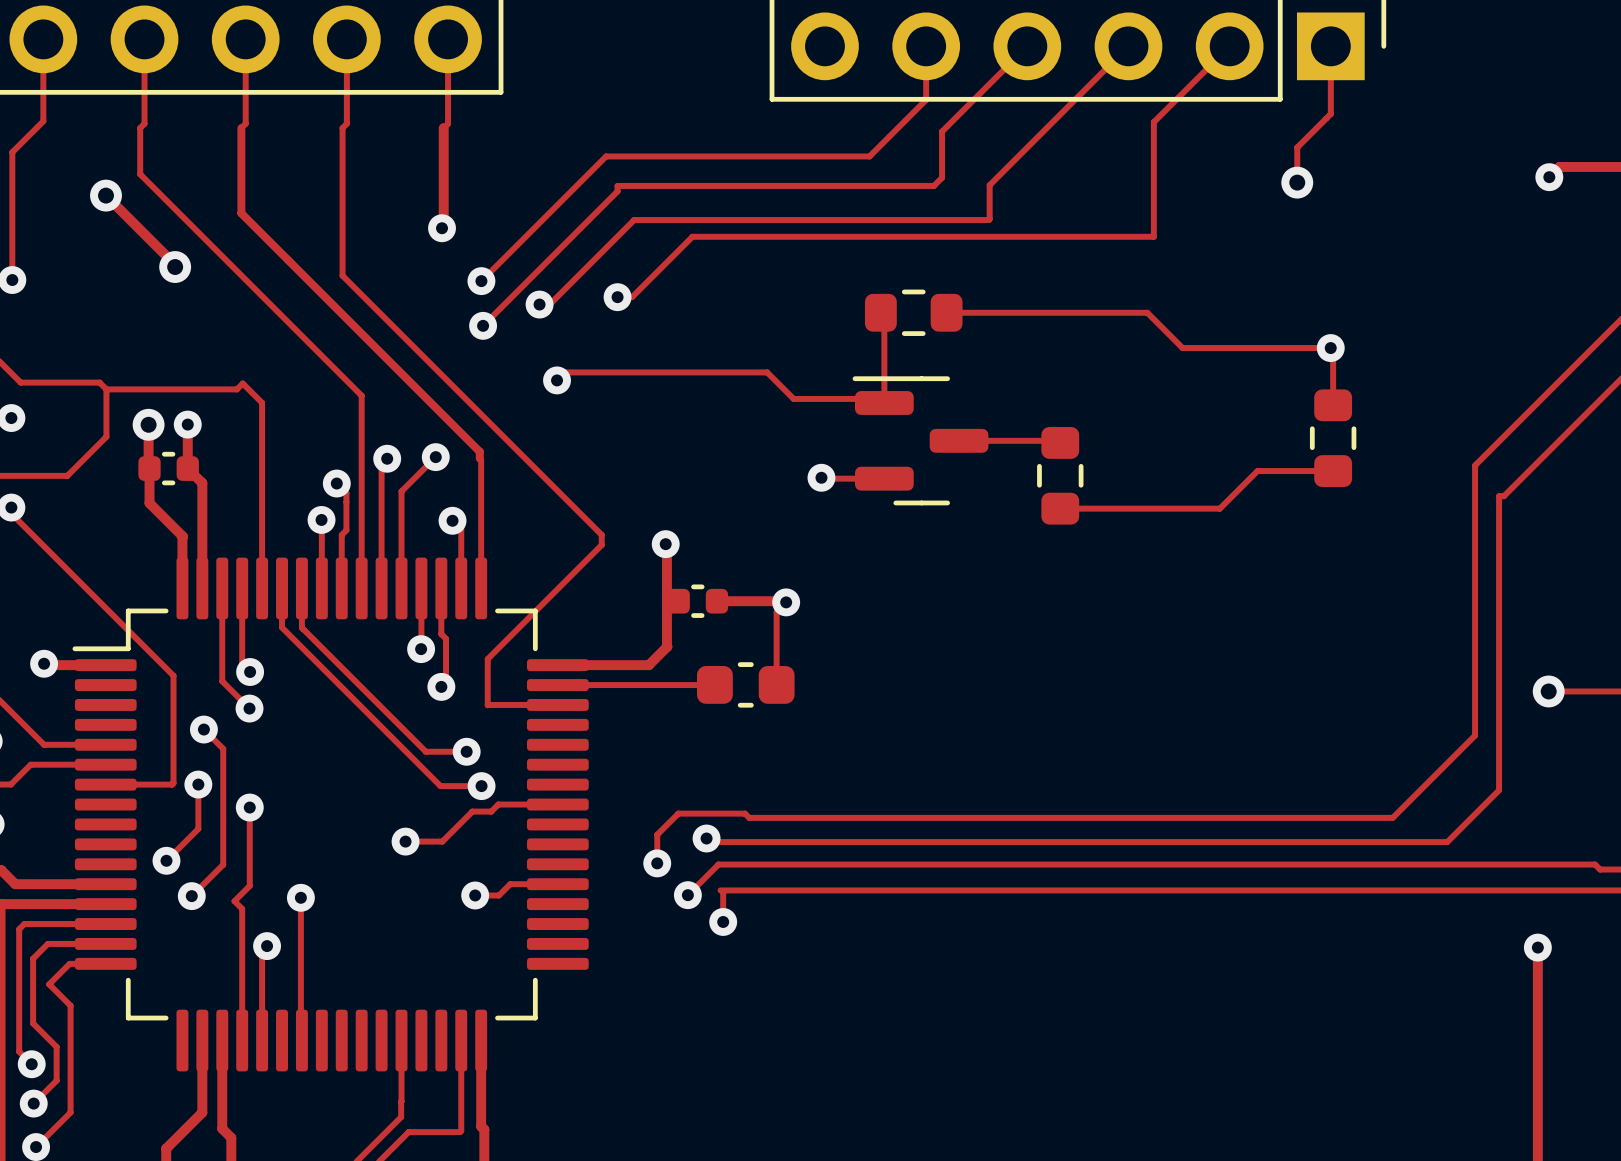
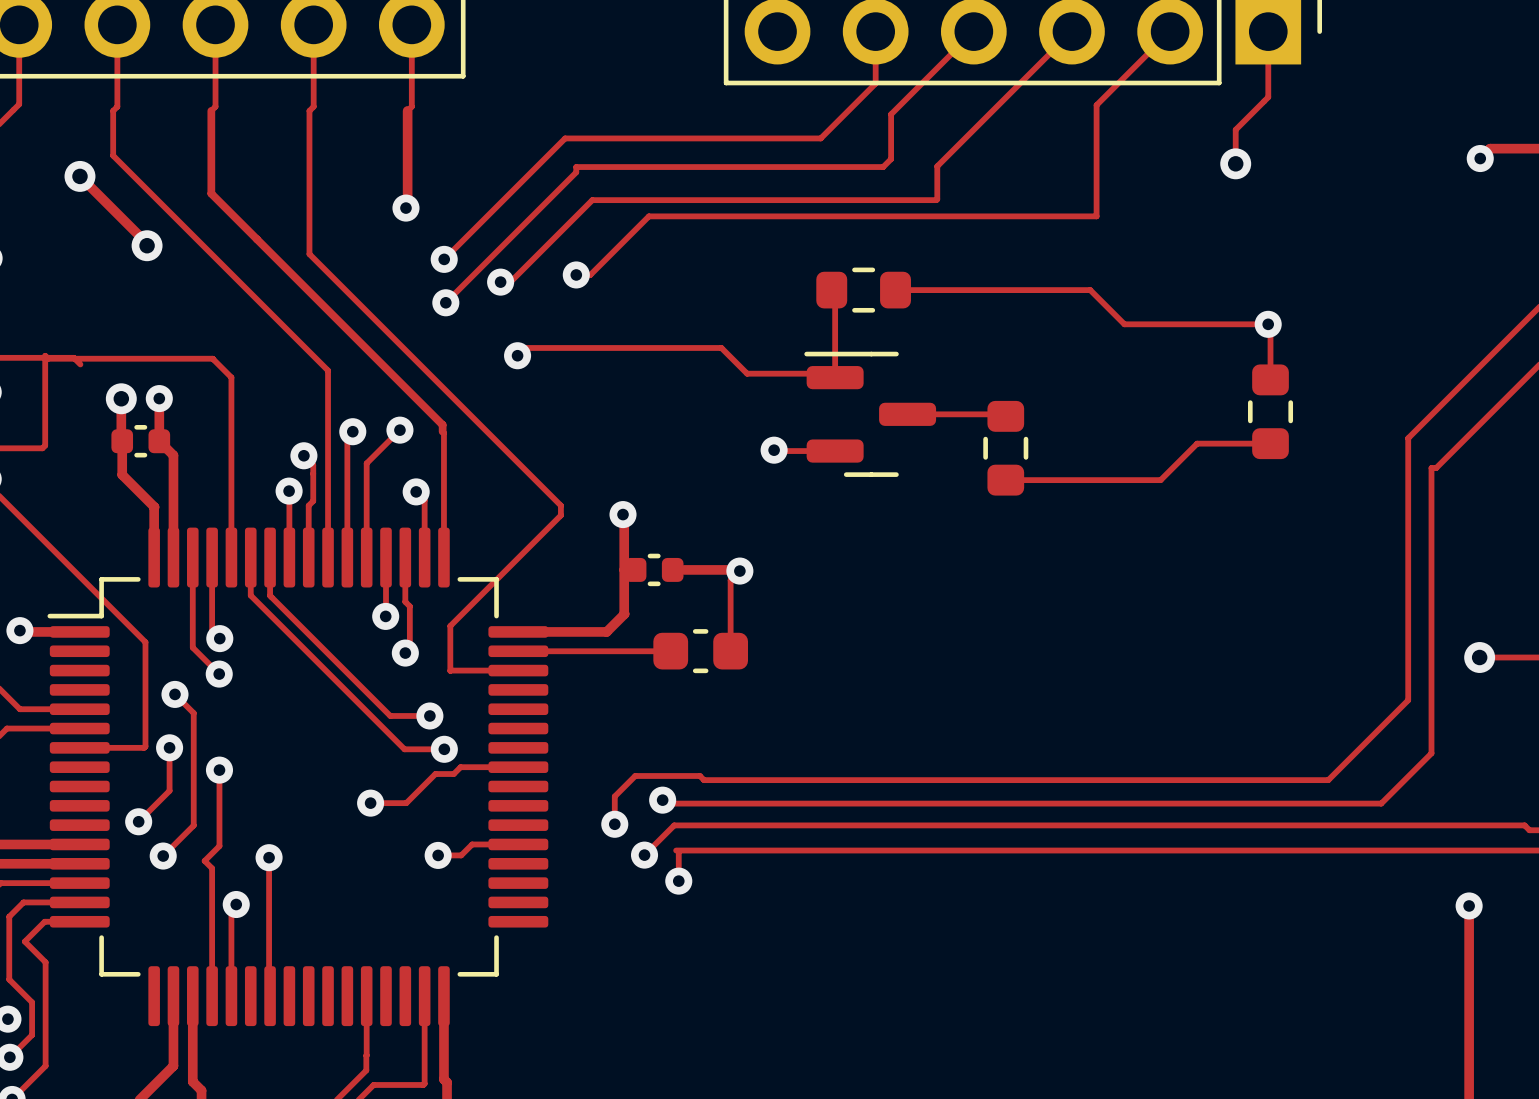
track: (242, 383) (236, 389) (106, 389) (106, 436) (70, 473) -> (212, 358) (48, 358) (45, 355) (45, 445)

